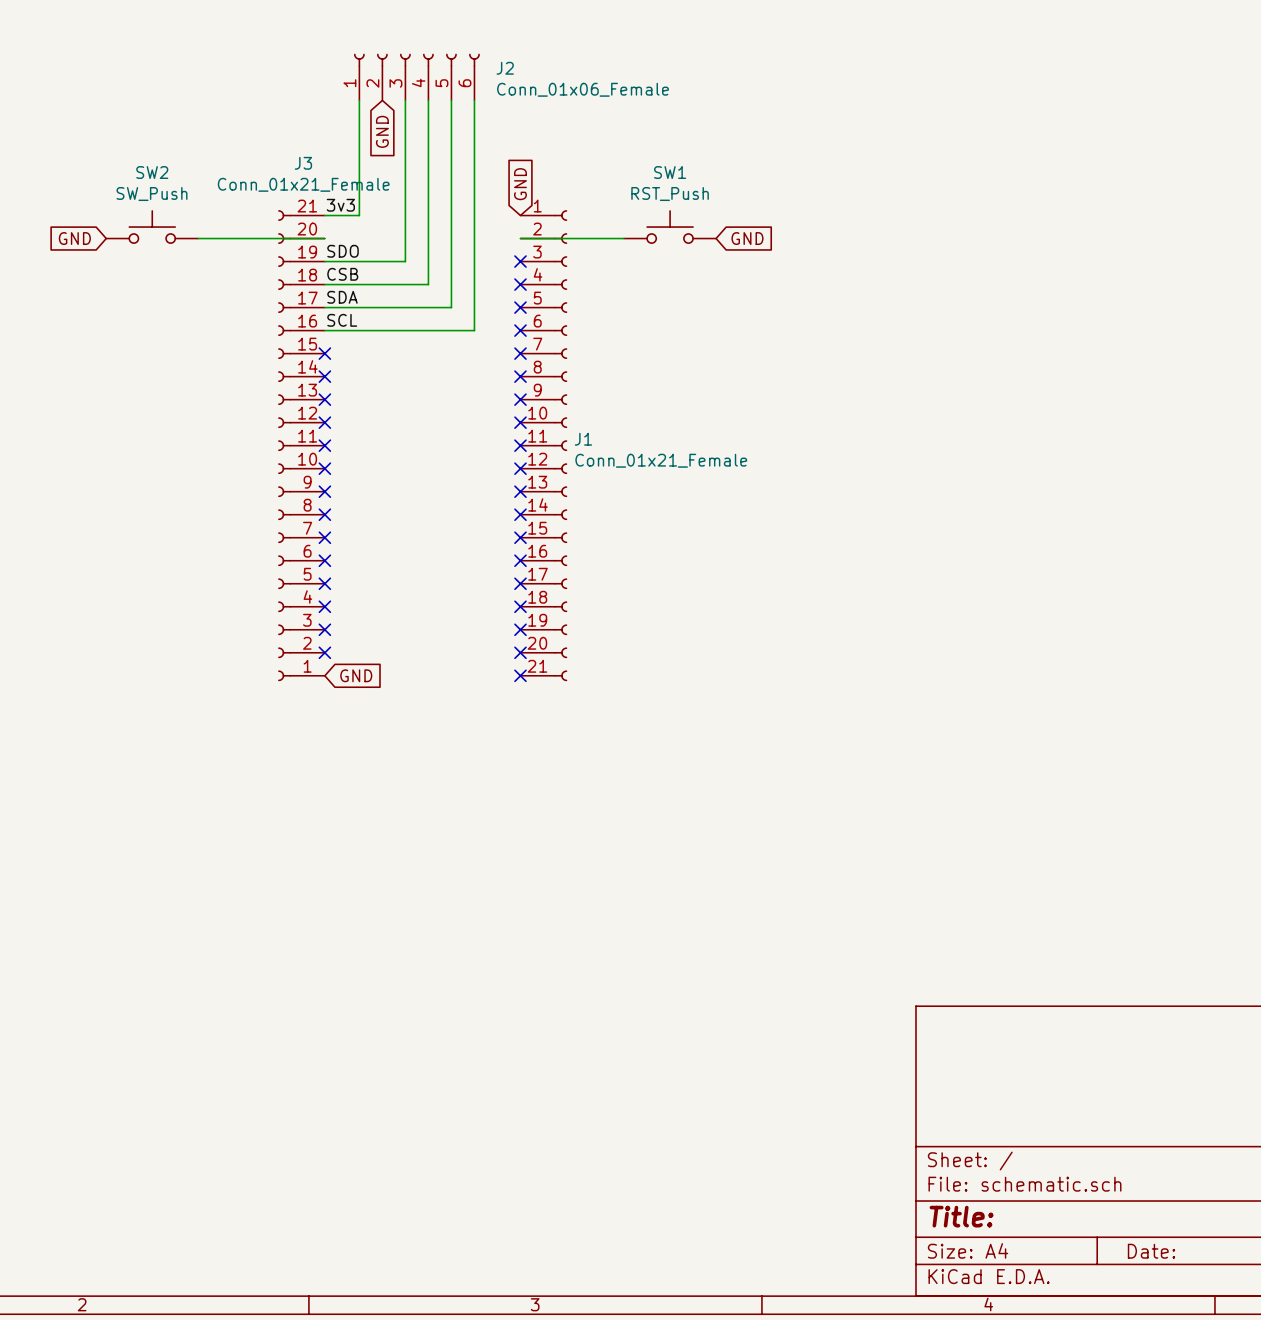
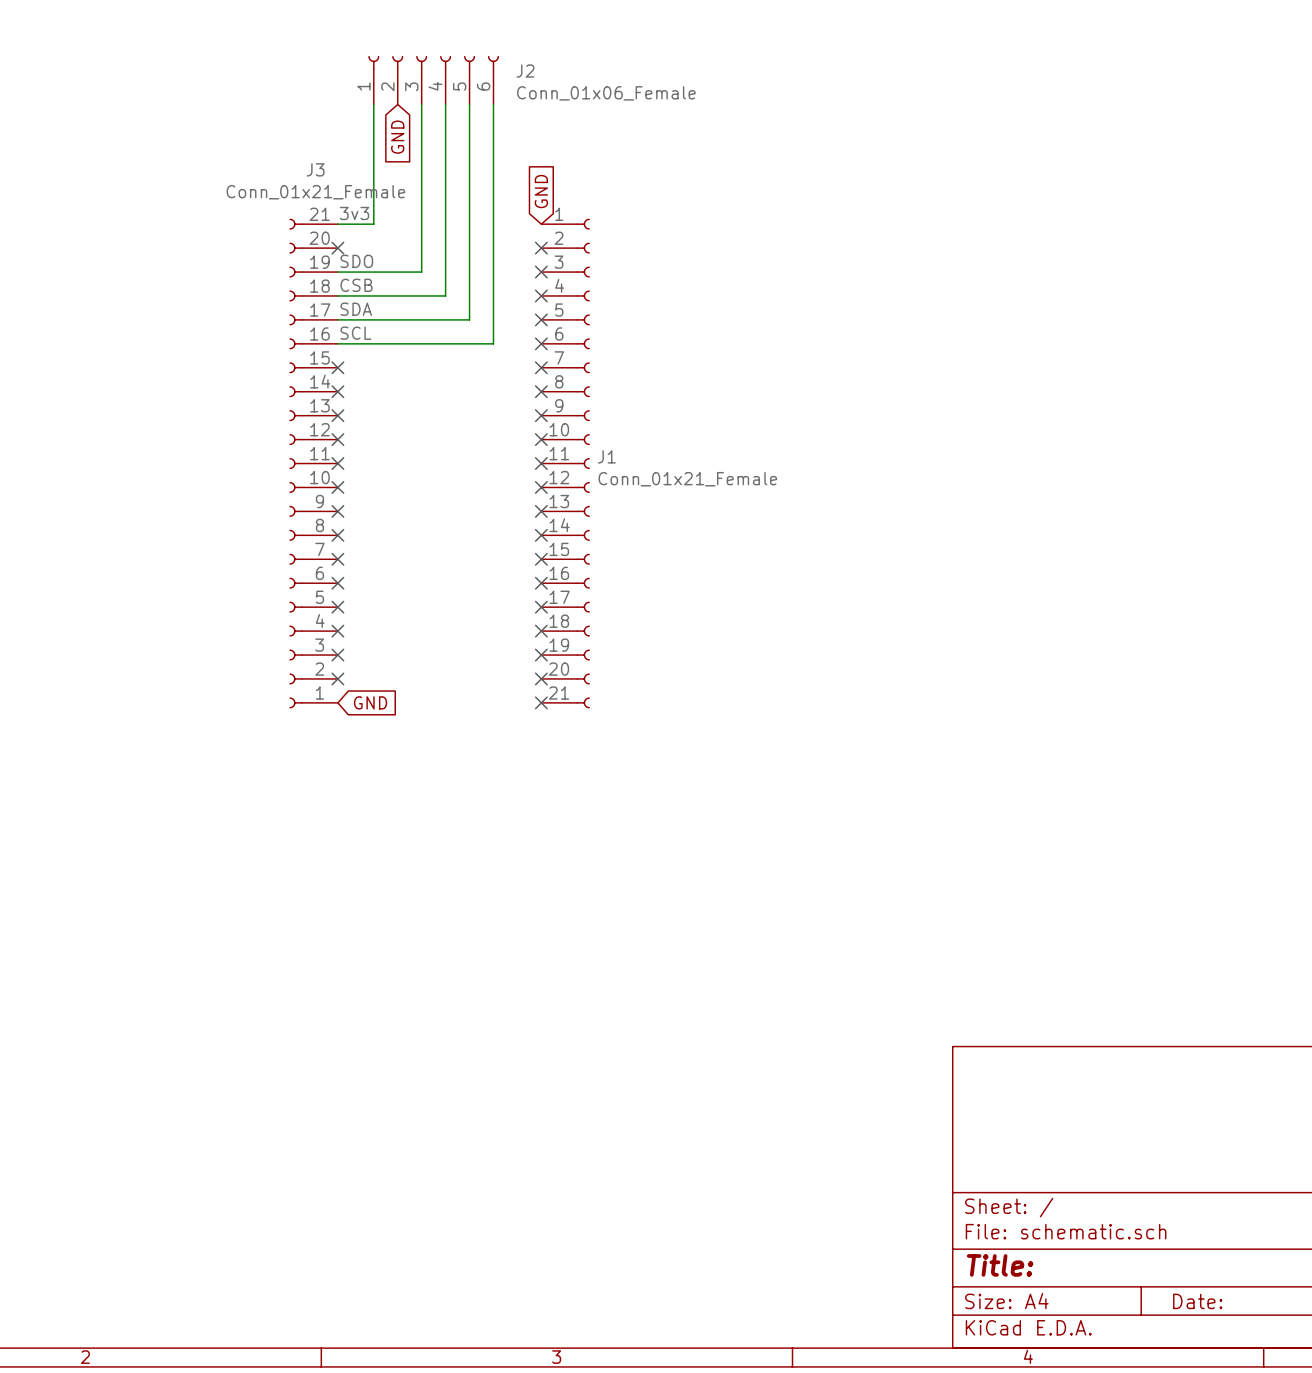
SW2: SW_Push (152, 227) -> none
SW1: RST_Push (670, 227) -> none
global label: GND (74, 238) -> none
wire: (198, 238) (324, 238) -> none
no-connect mark: none -> (337, 248)
wire: (520, 238) (624, 238) -> none
no-connect mark: none -> (541, 248)
global label: GND (747, 238) -> none

